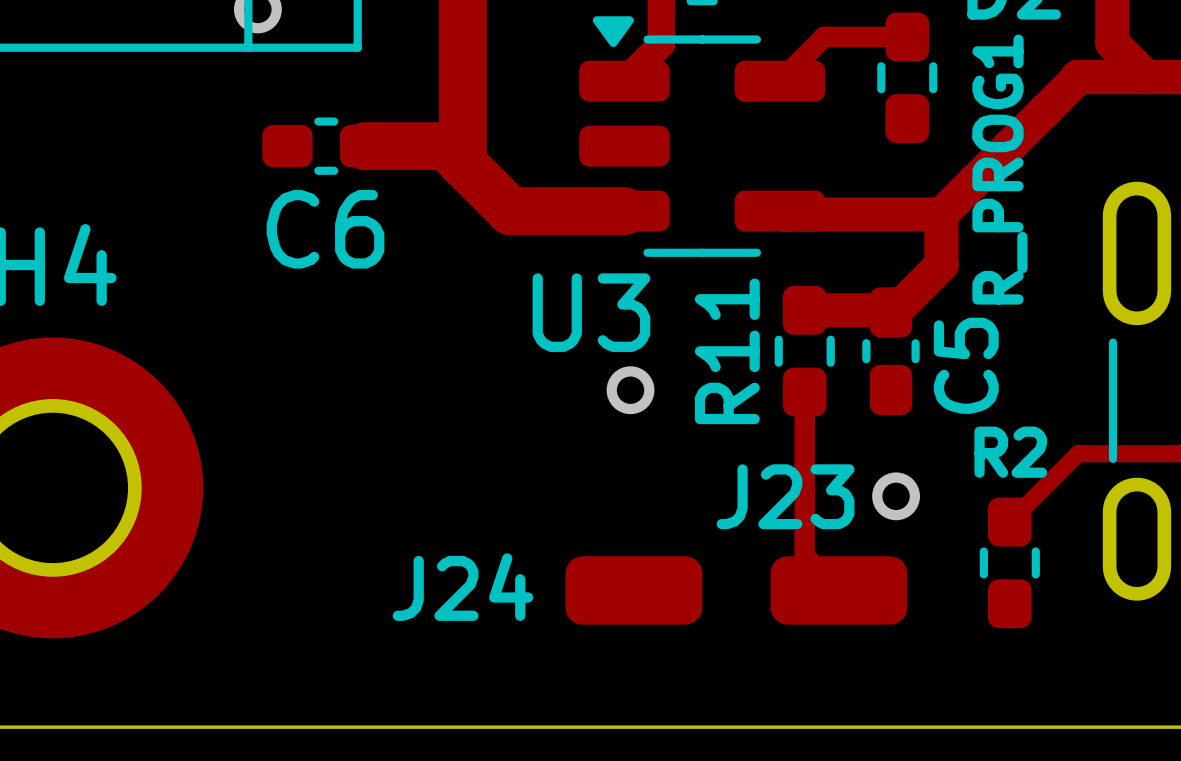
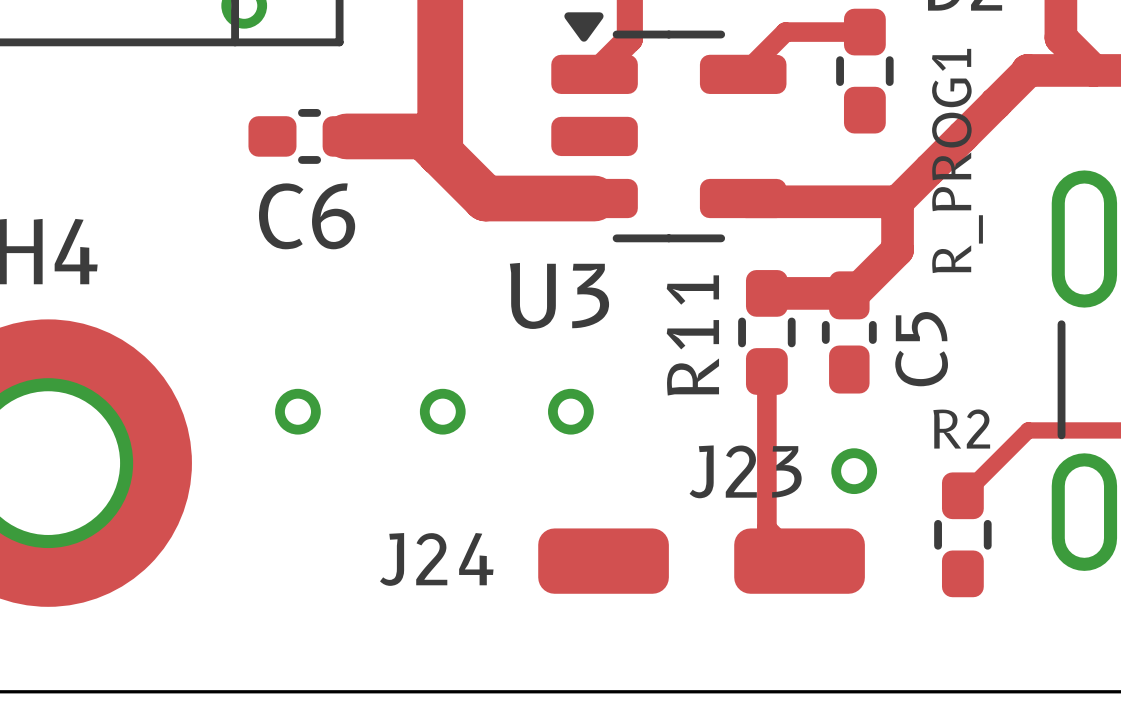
via position: (630, 390) -> (570, 411)
via: none -> (297, 411)
via: none -> (442, 411)

